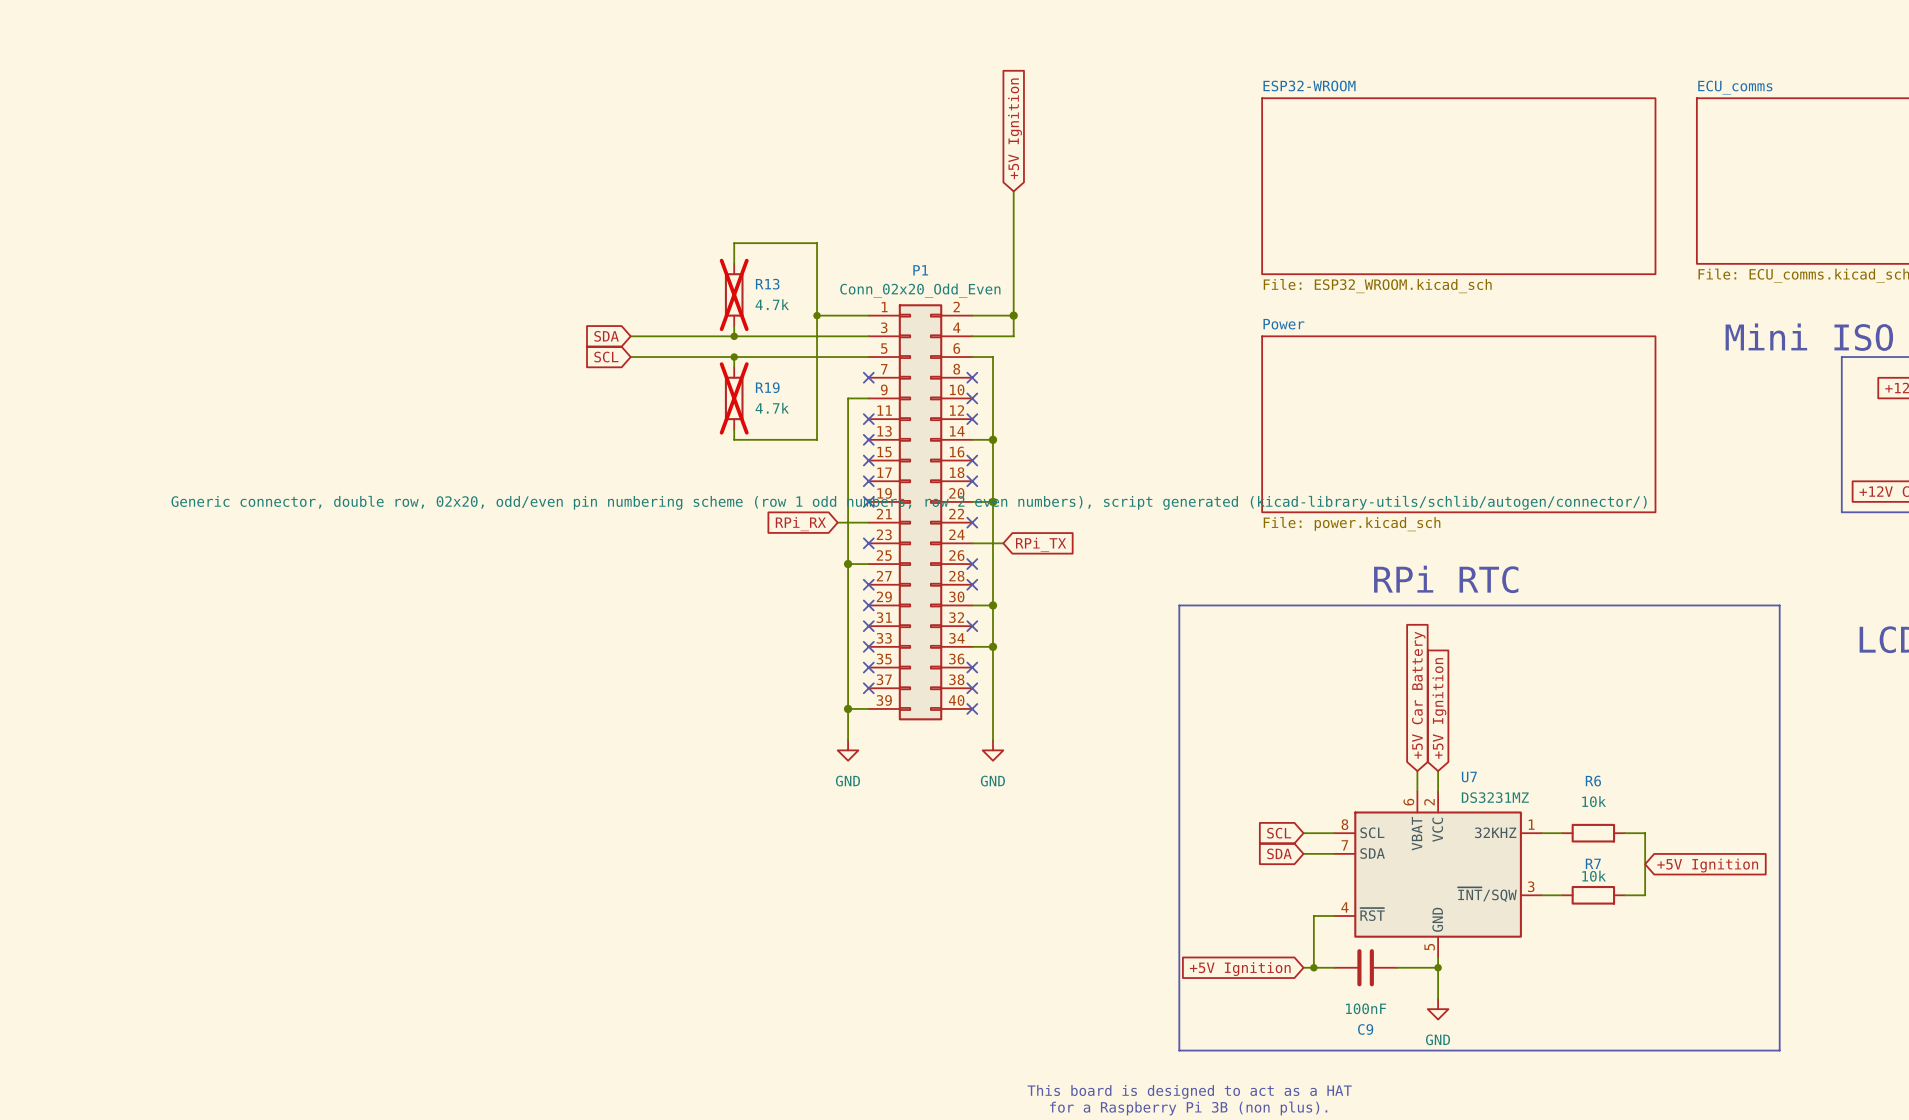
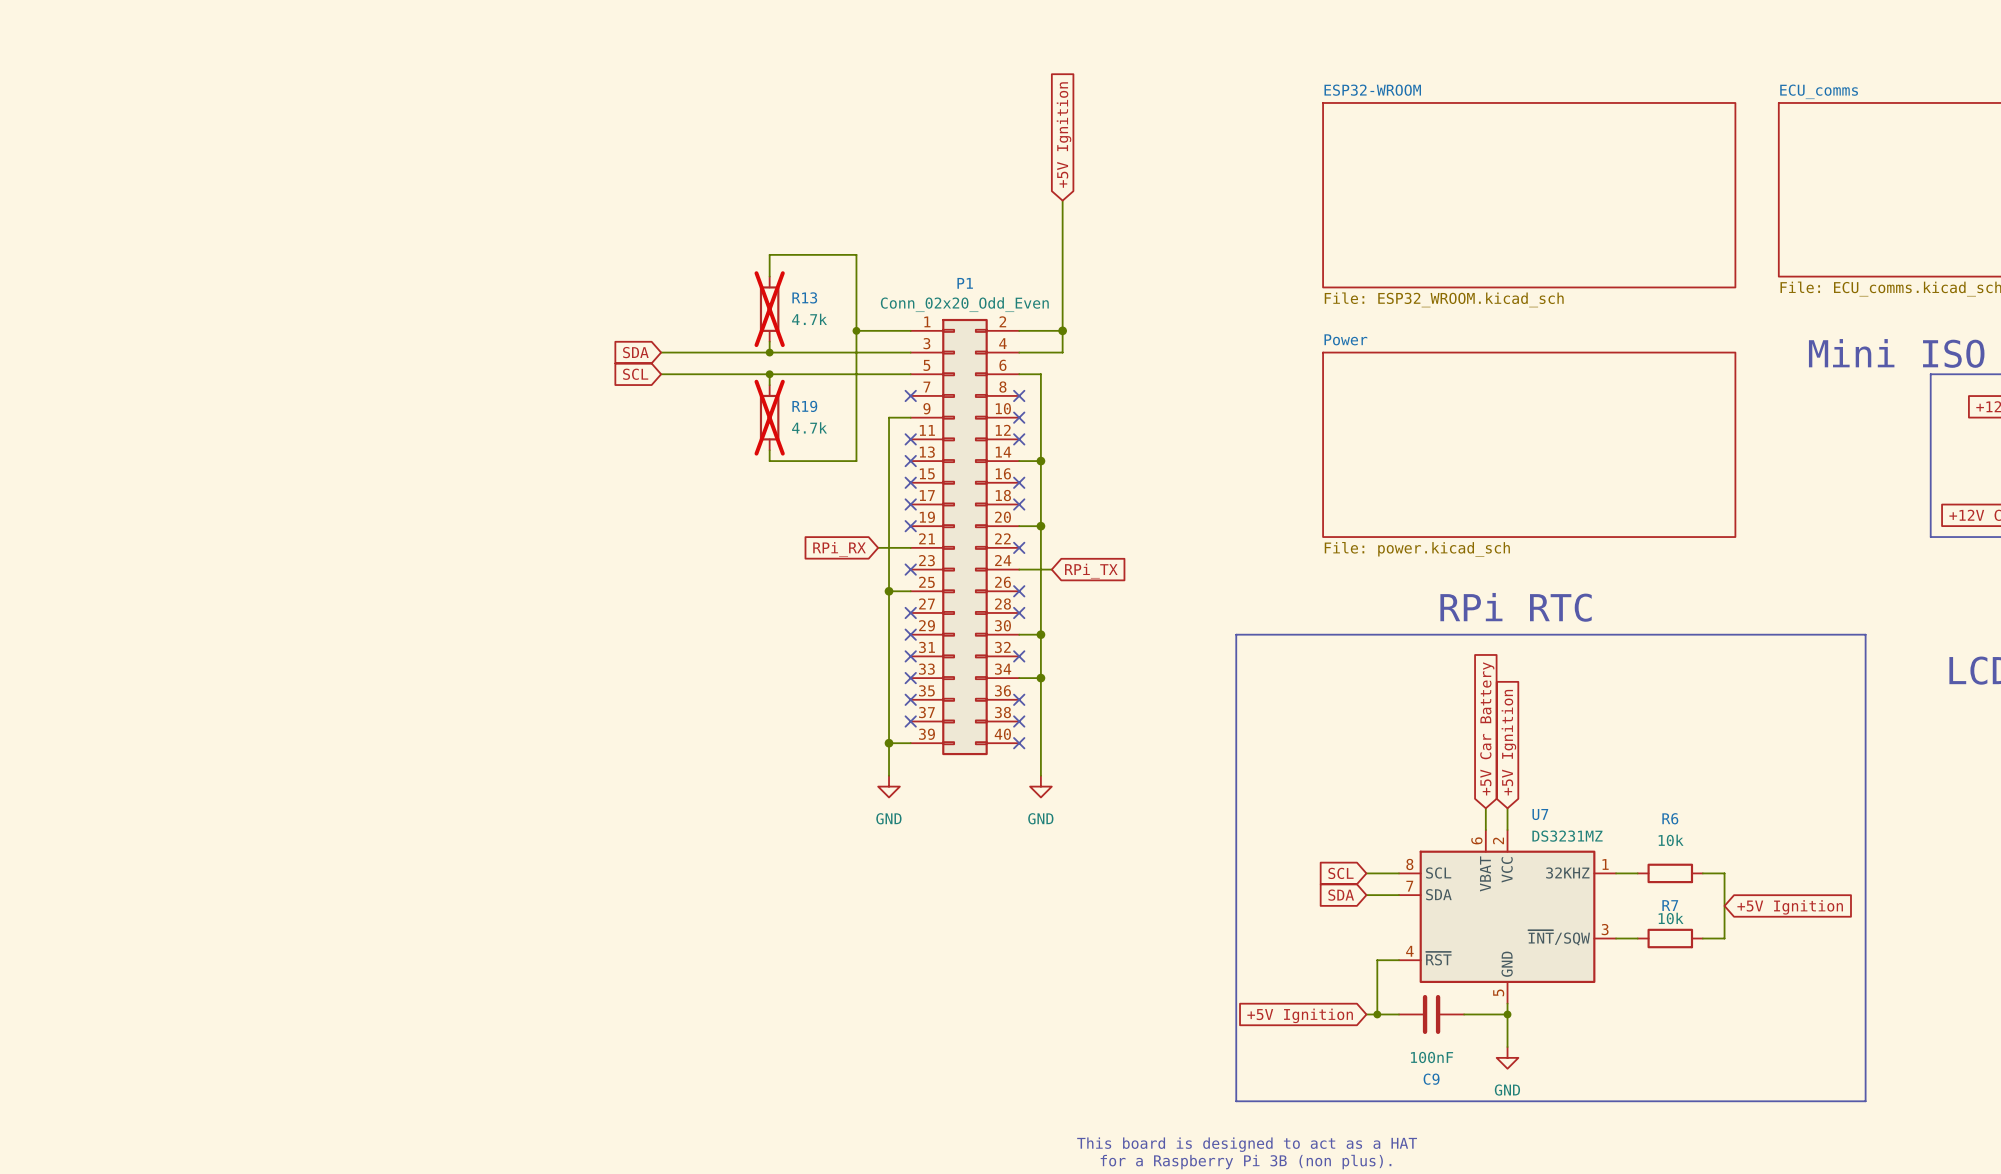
P1 text: Generic connector, double row, 02x20, odd/even pin numbering scheme (row 1 odd numbers, row 2 even numbers), script generated (kicad-library-utils/schlib/autogen/connector/) (909, 502) -> none

